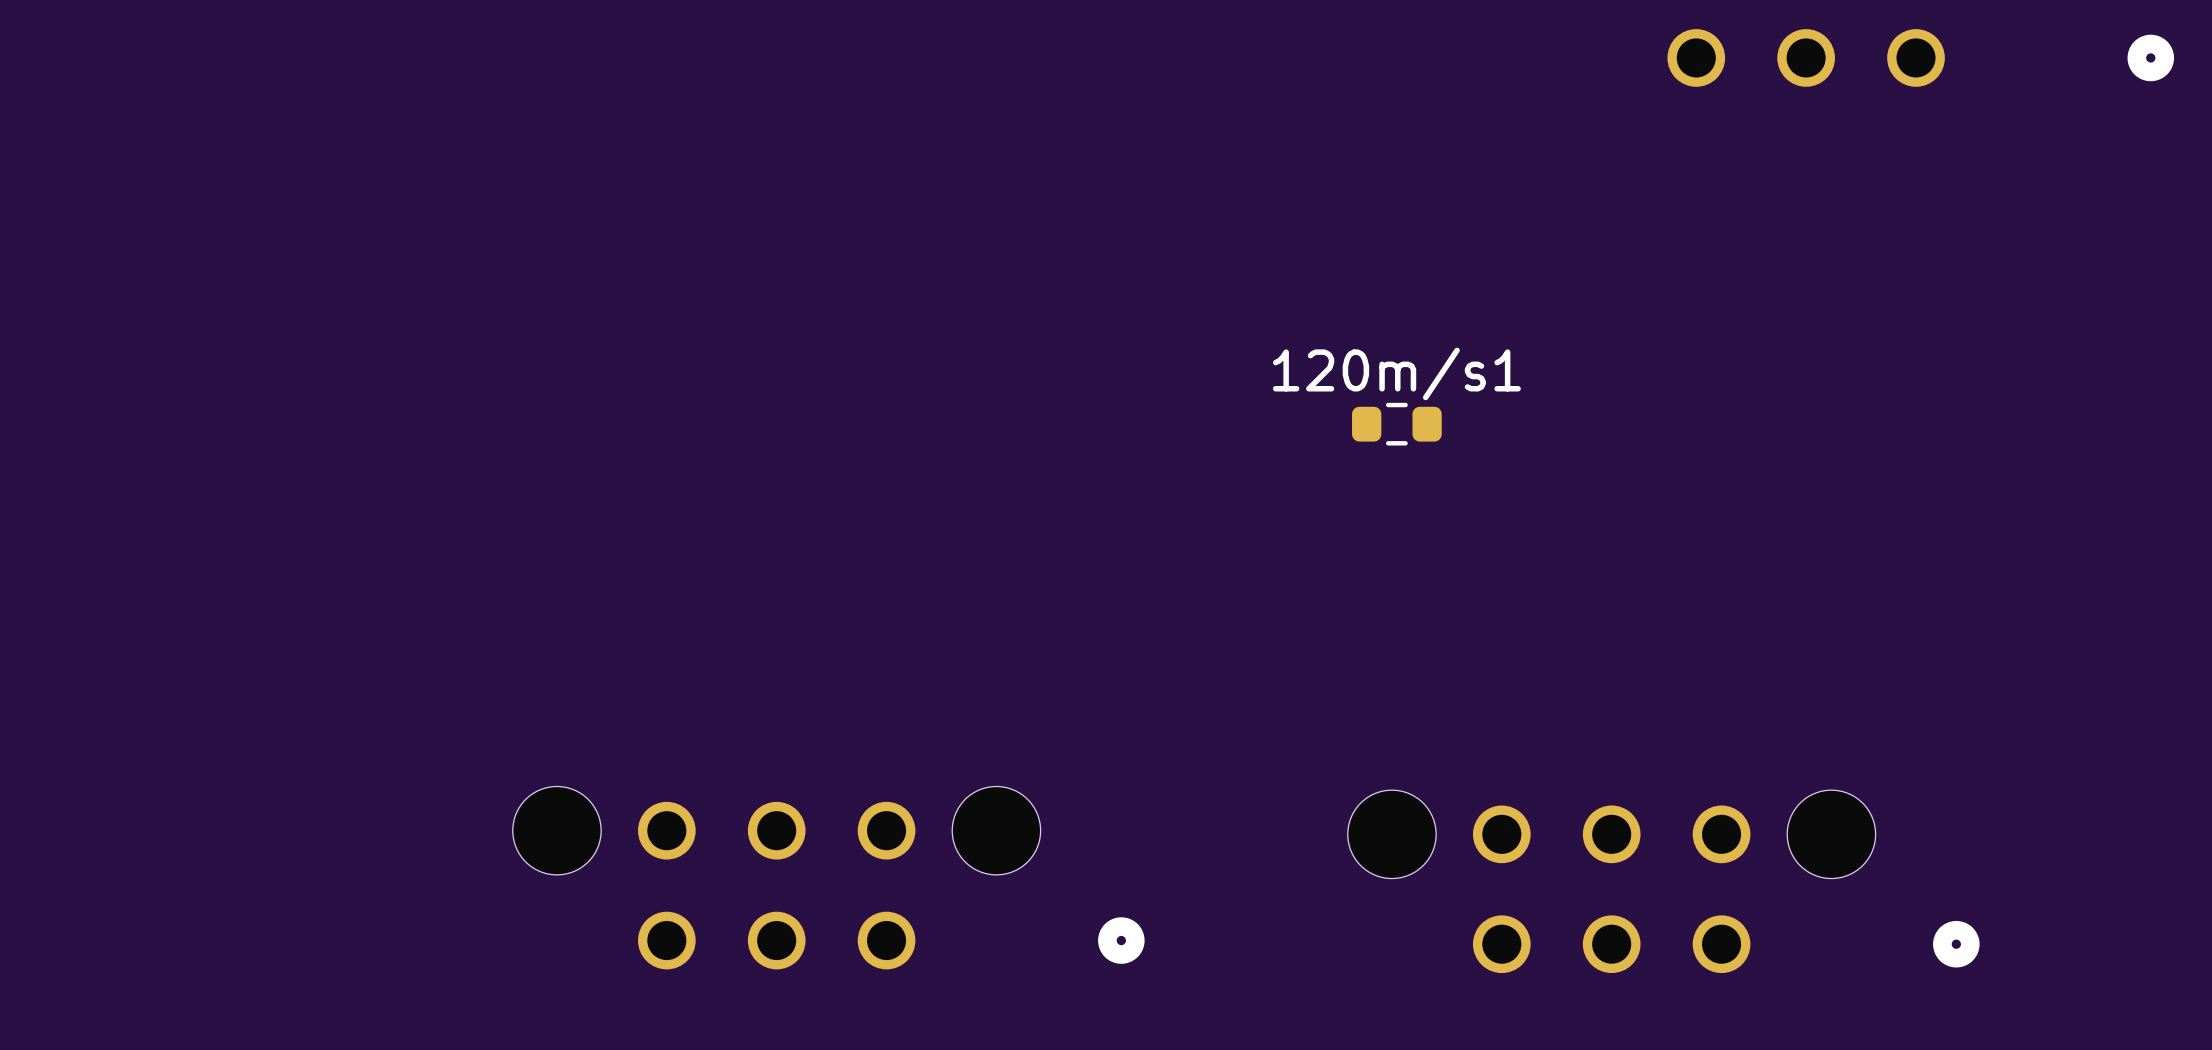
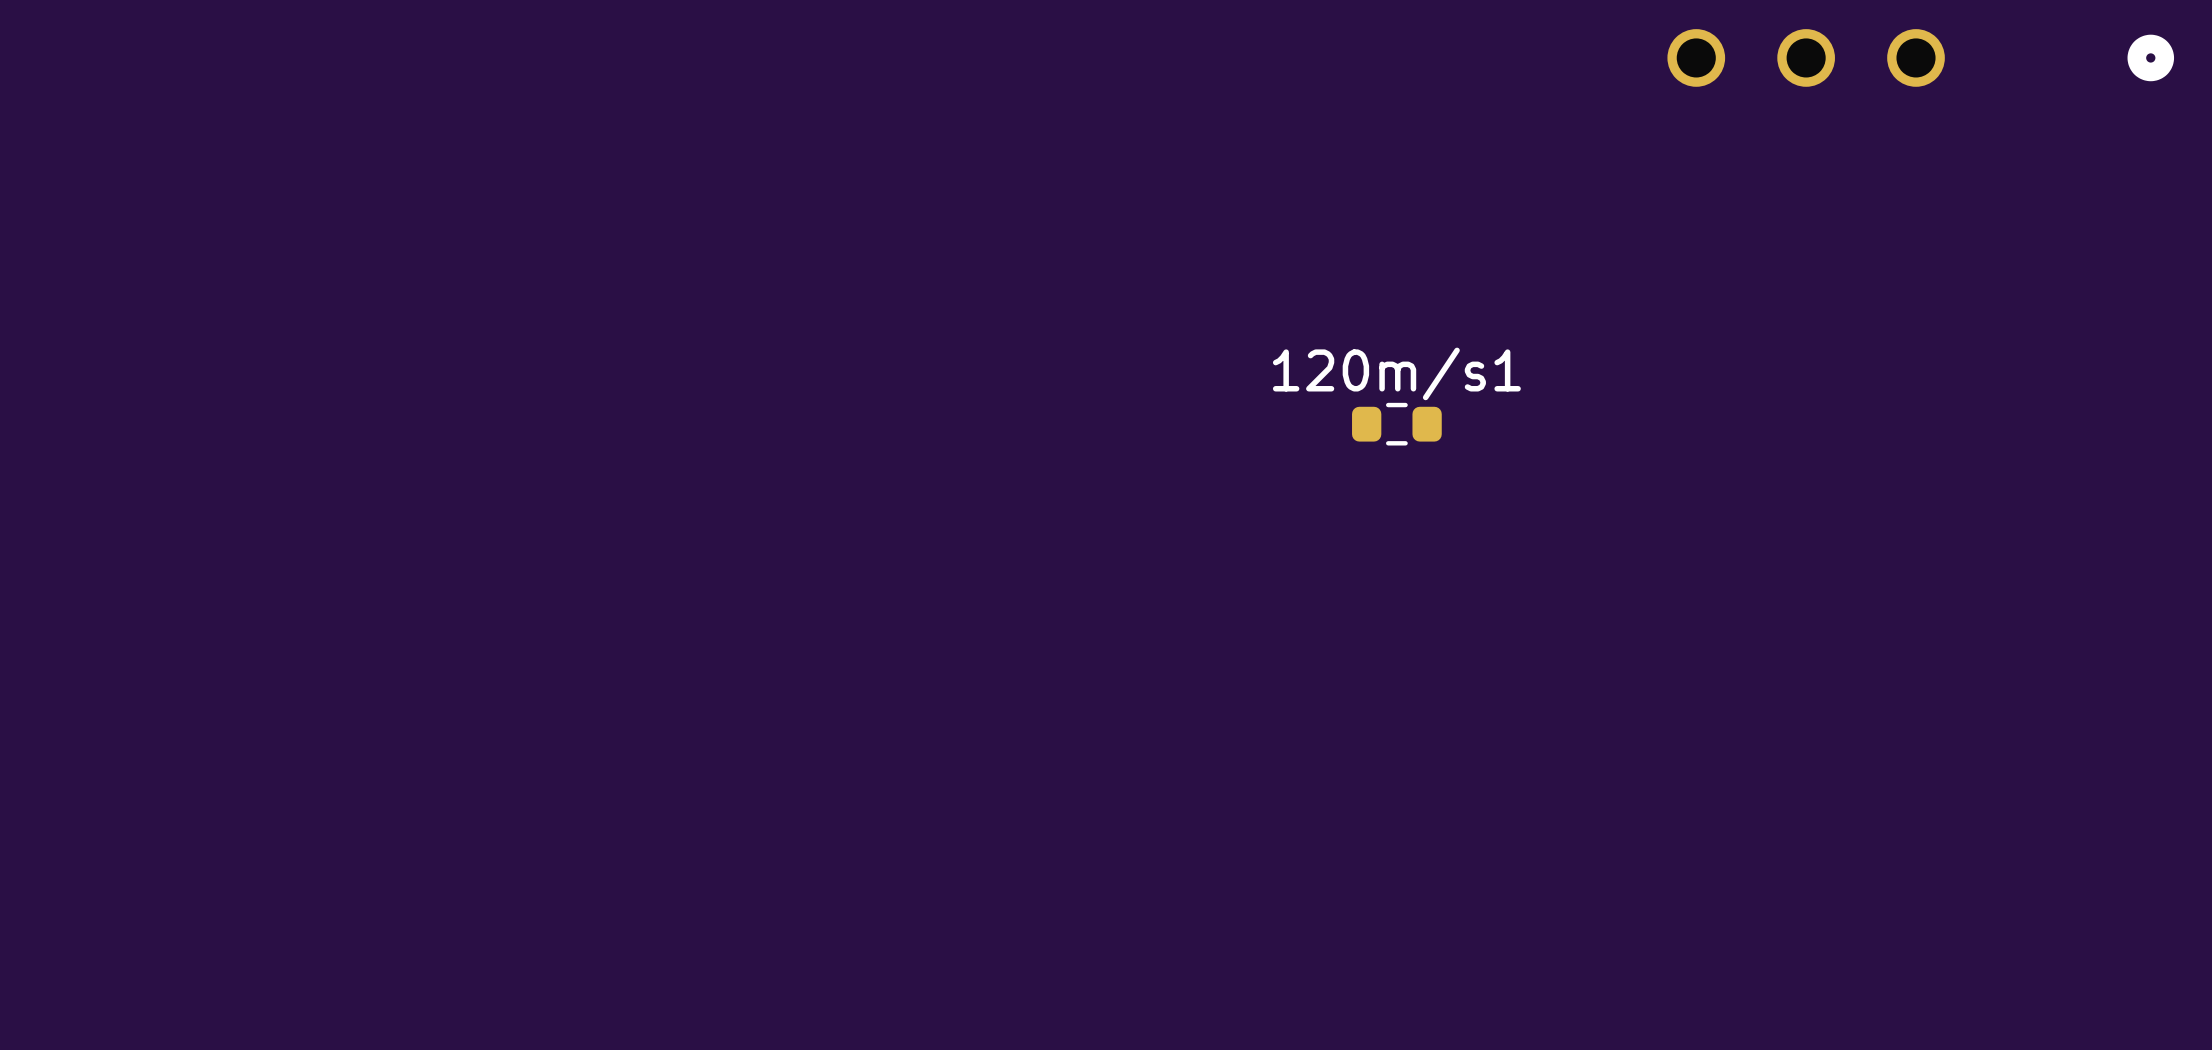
part: (828, 877) -> none
part: (1663, 881) -> none

